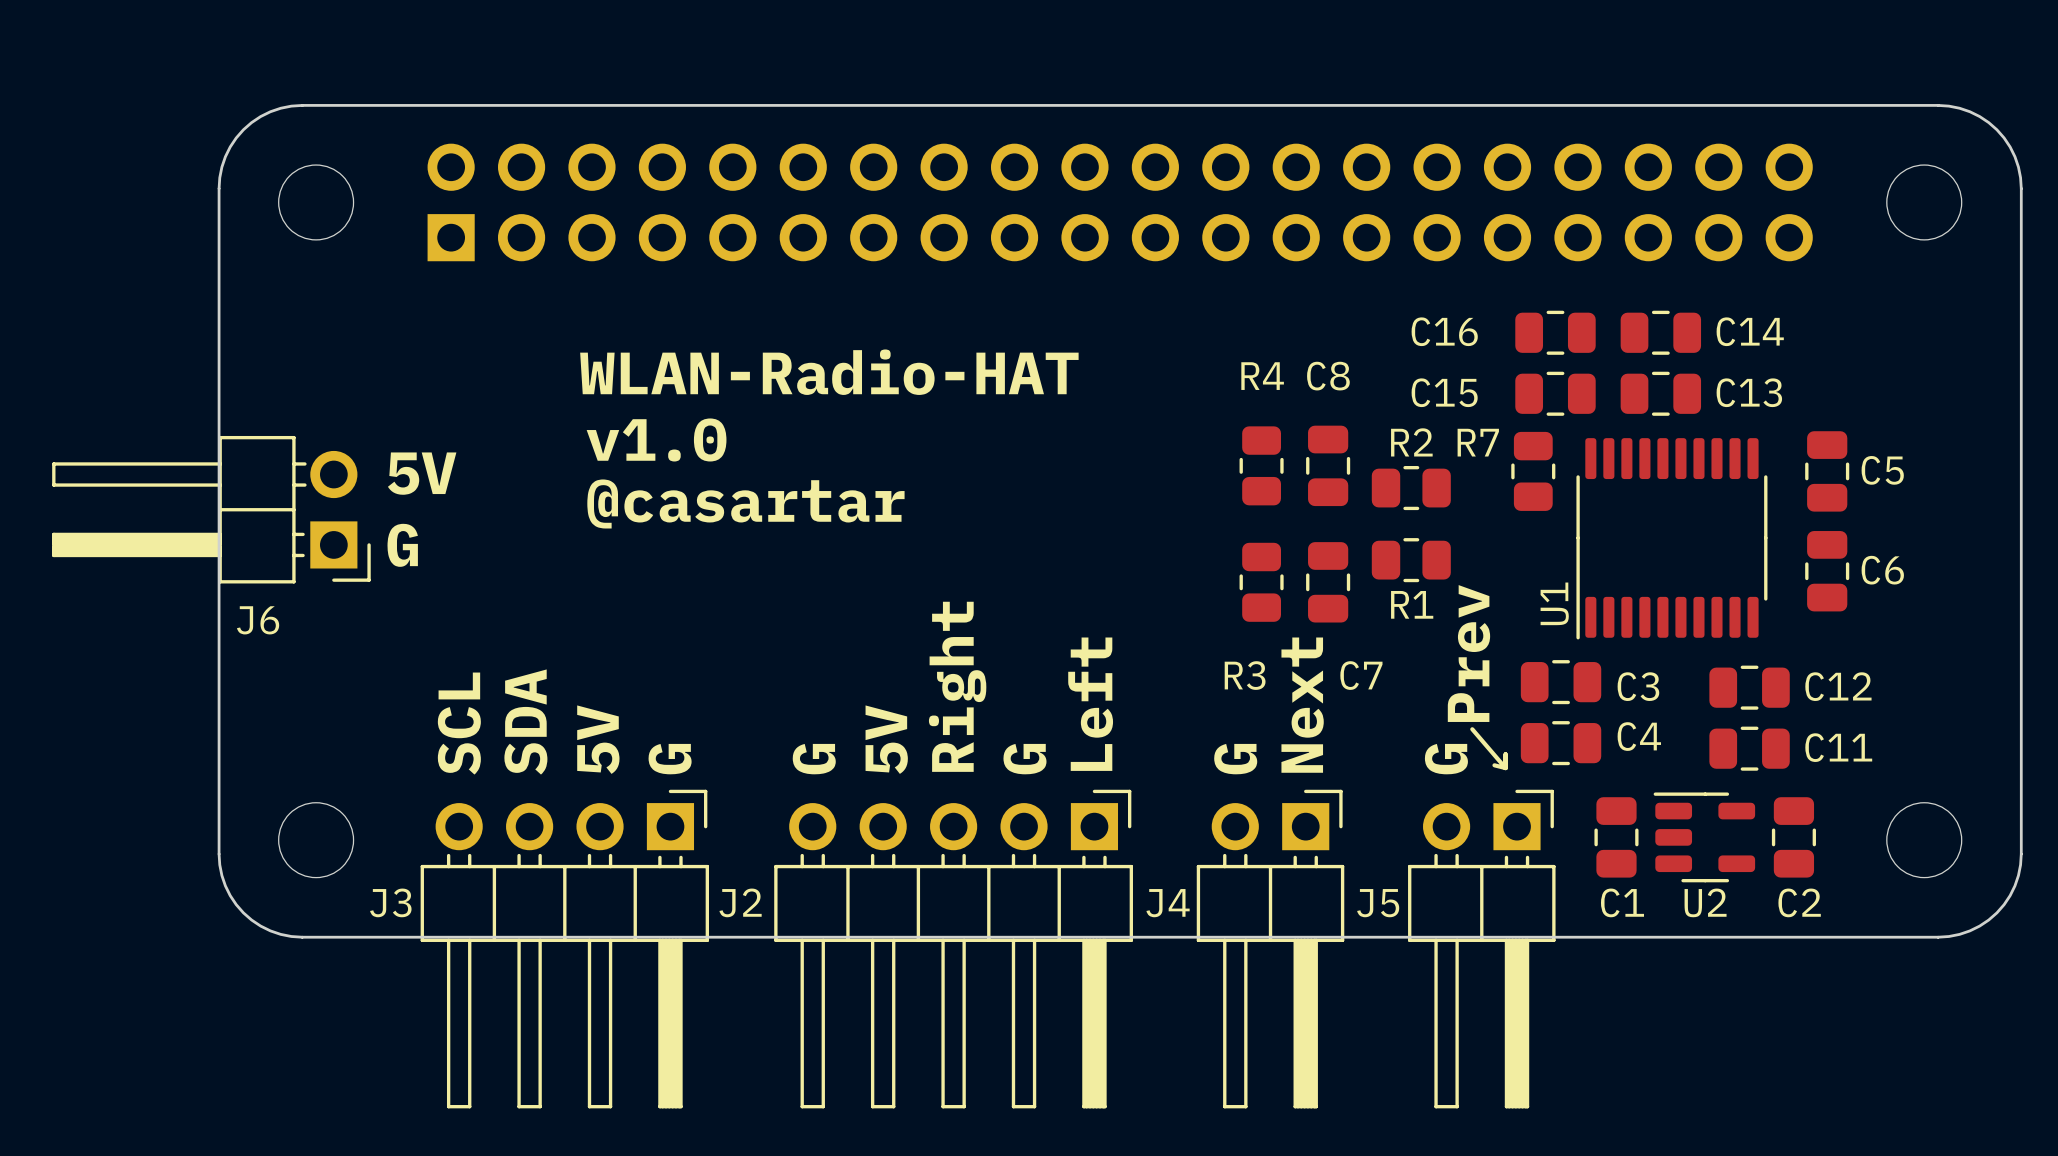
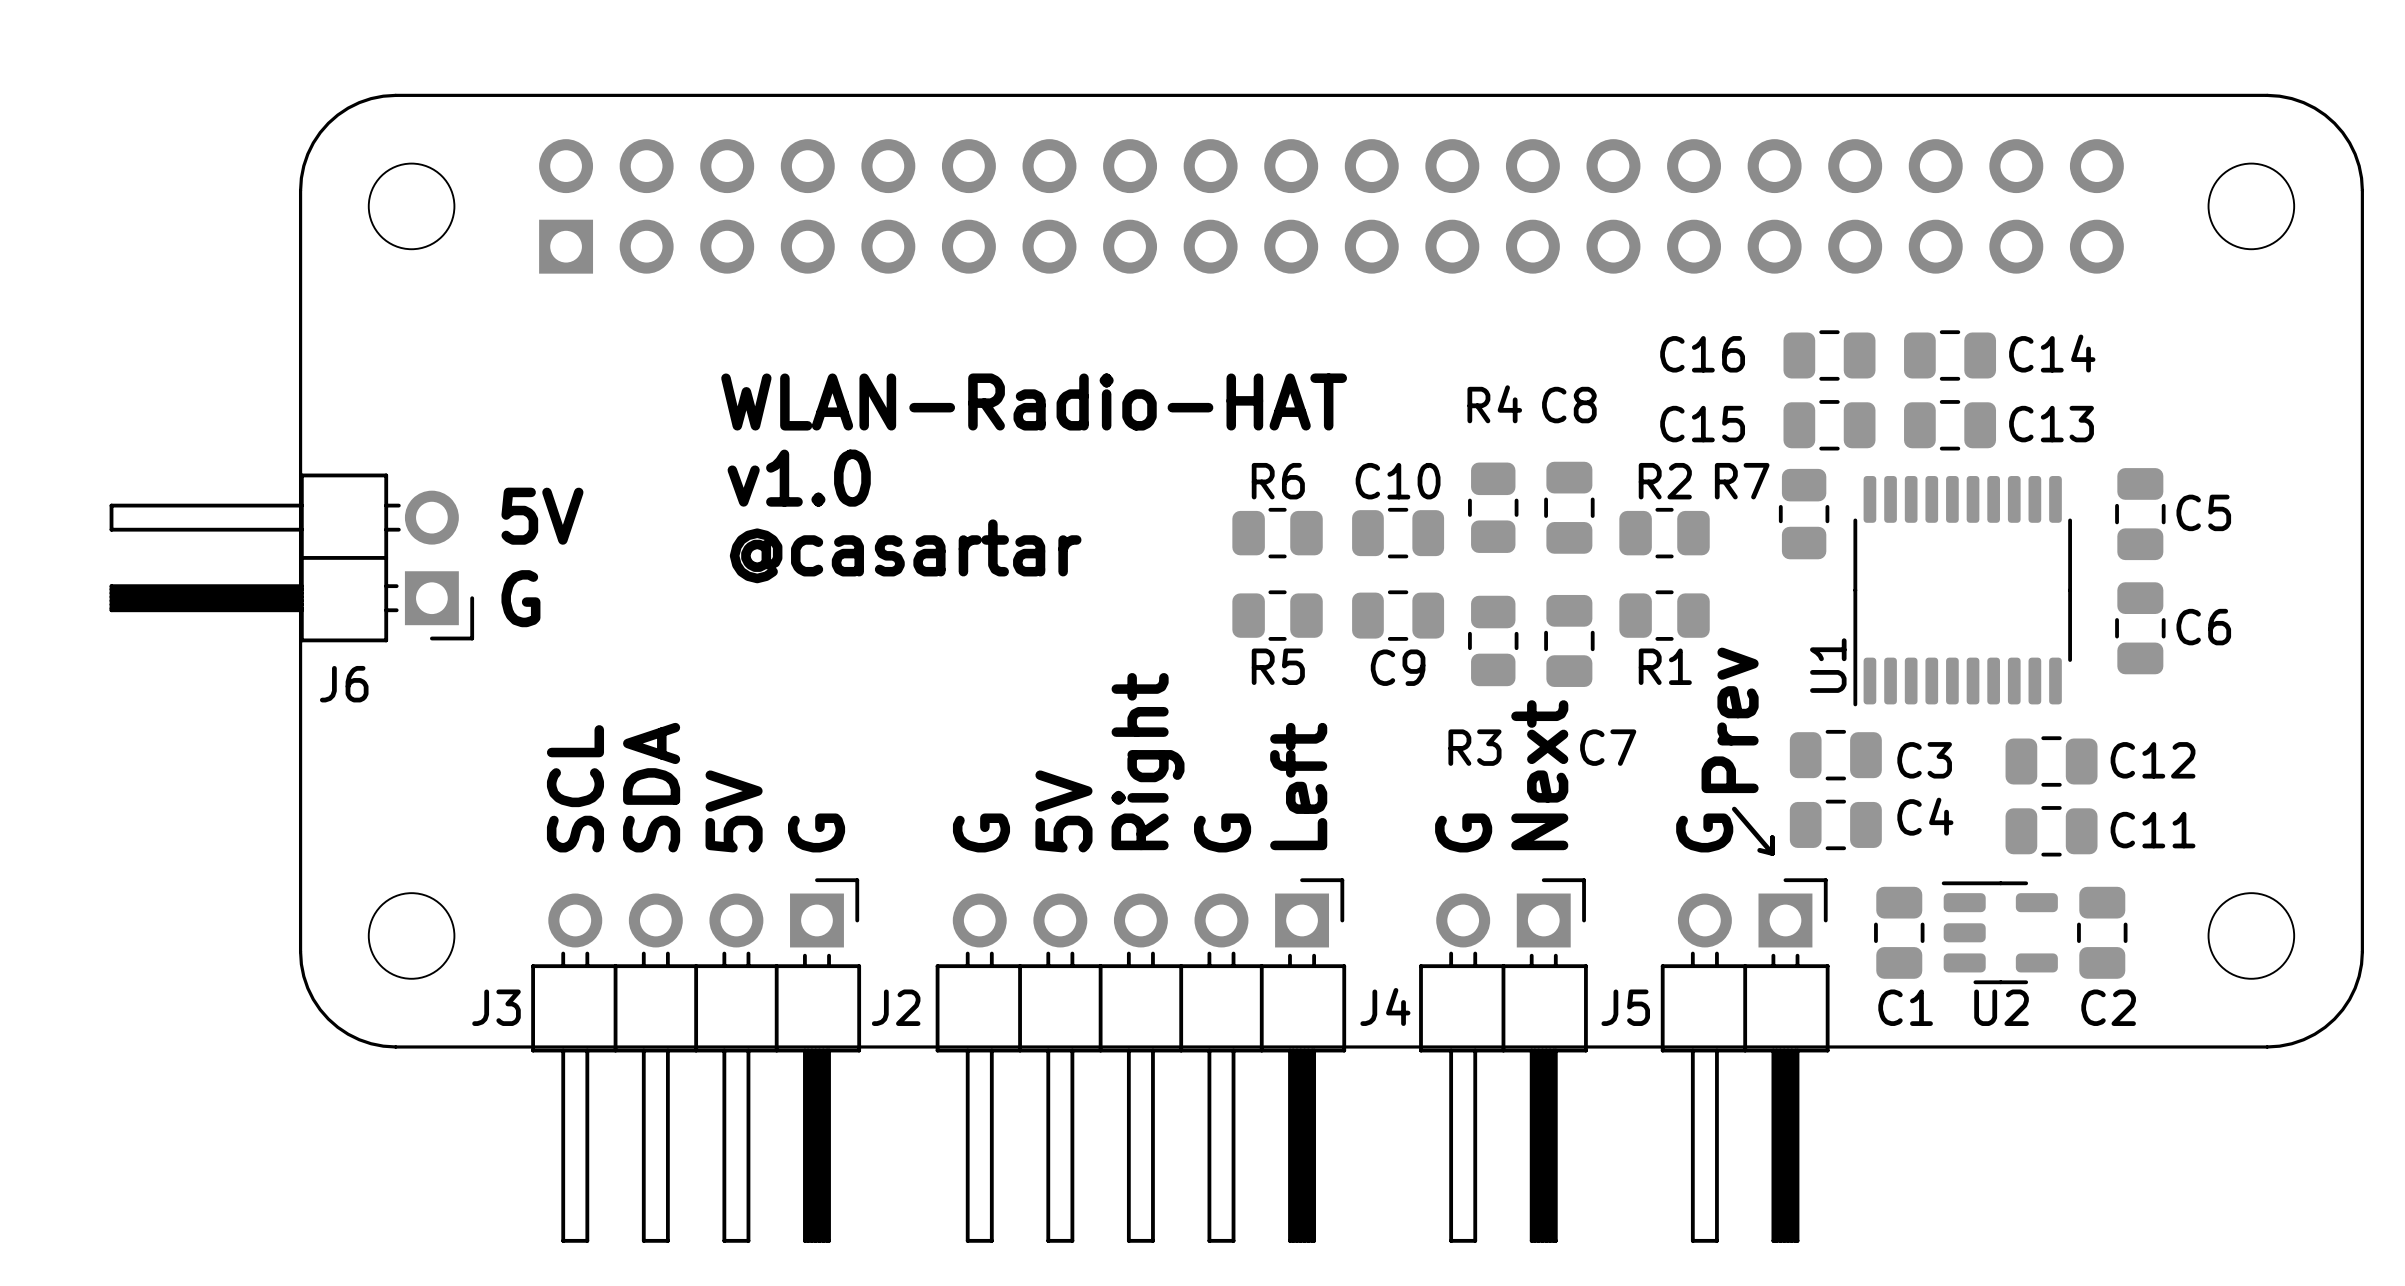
R6: none -> (1277, 533)
C10: none -> (1398, 533)
R5: none -> (1277, 615)
C9: none -> (1398, 615)

